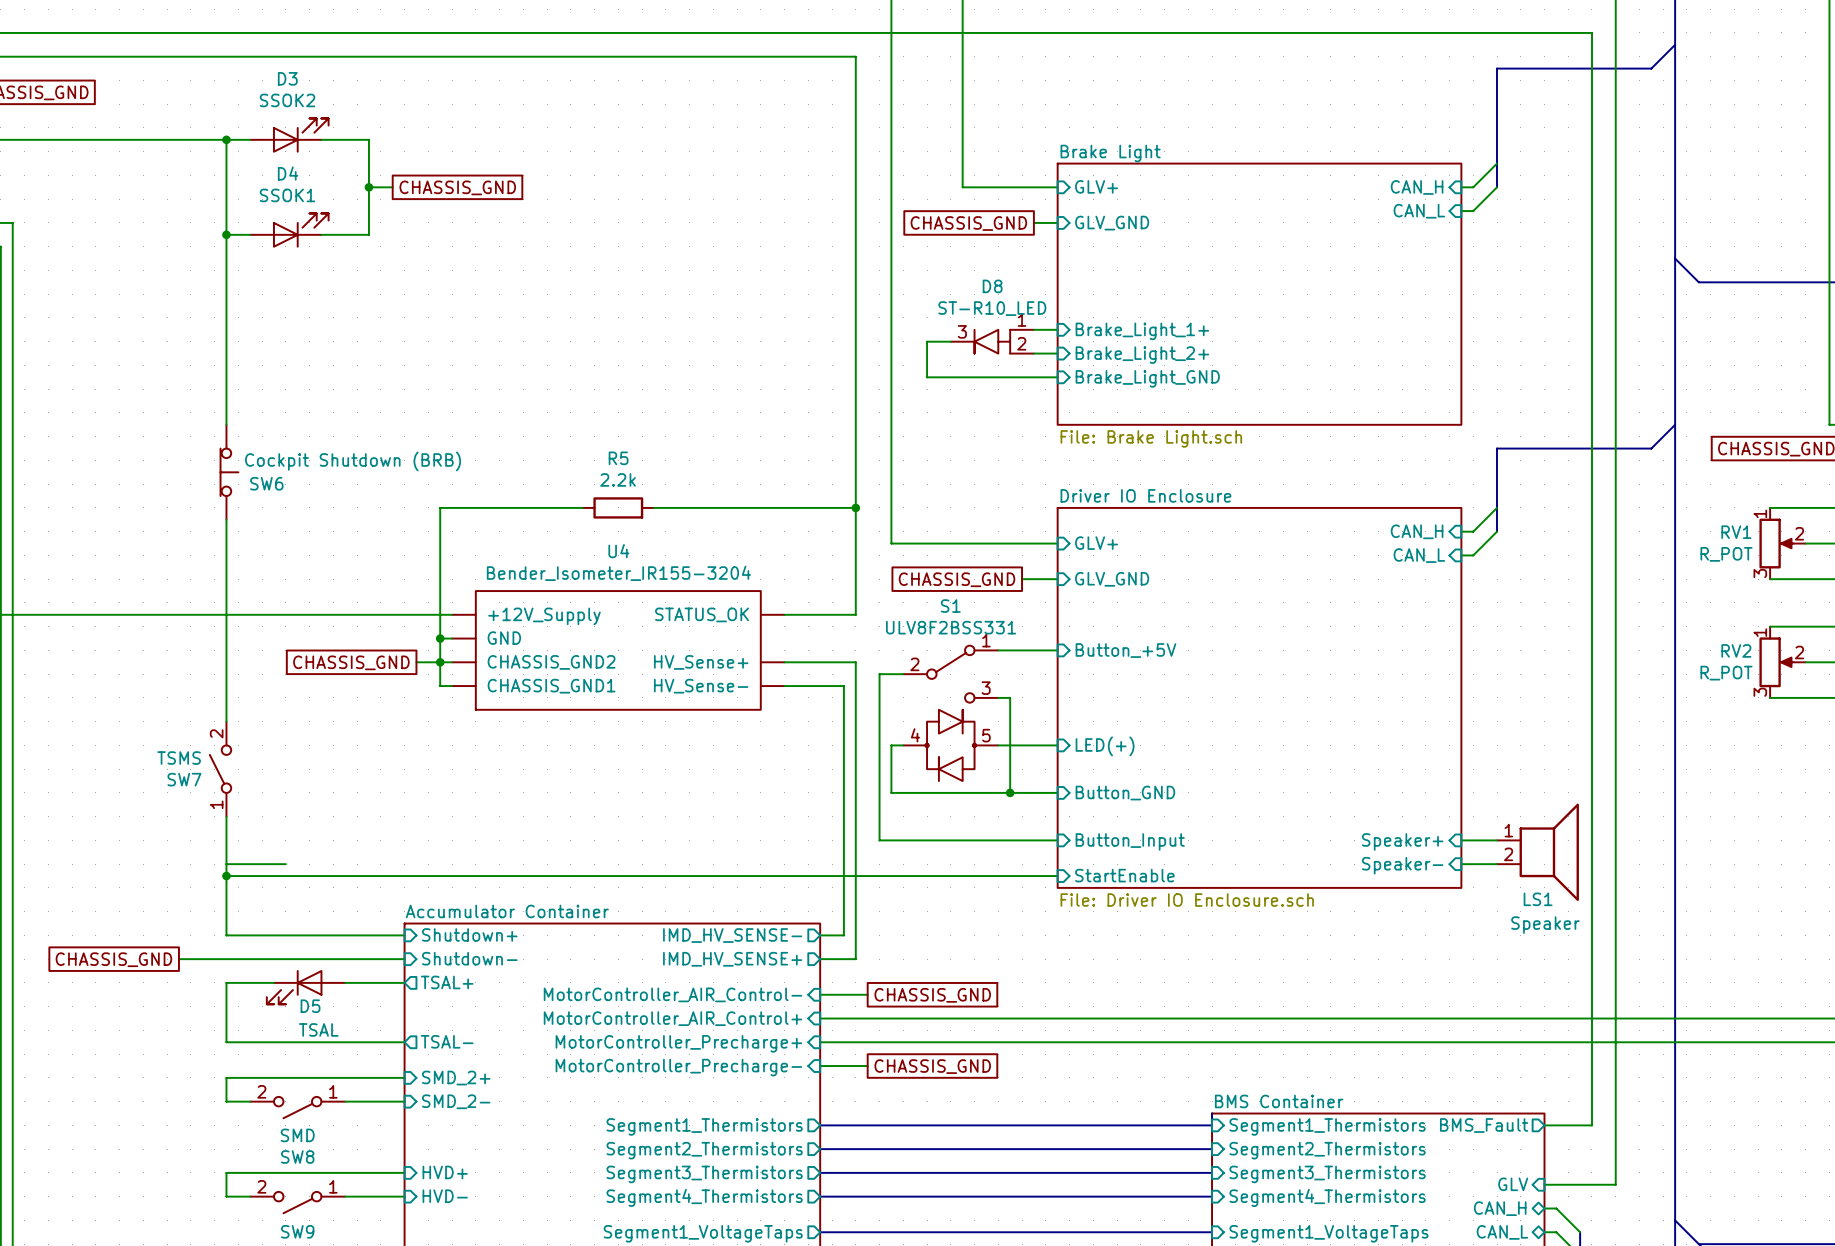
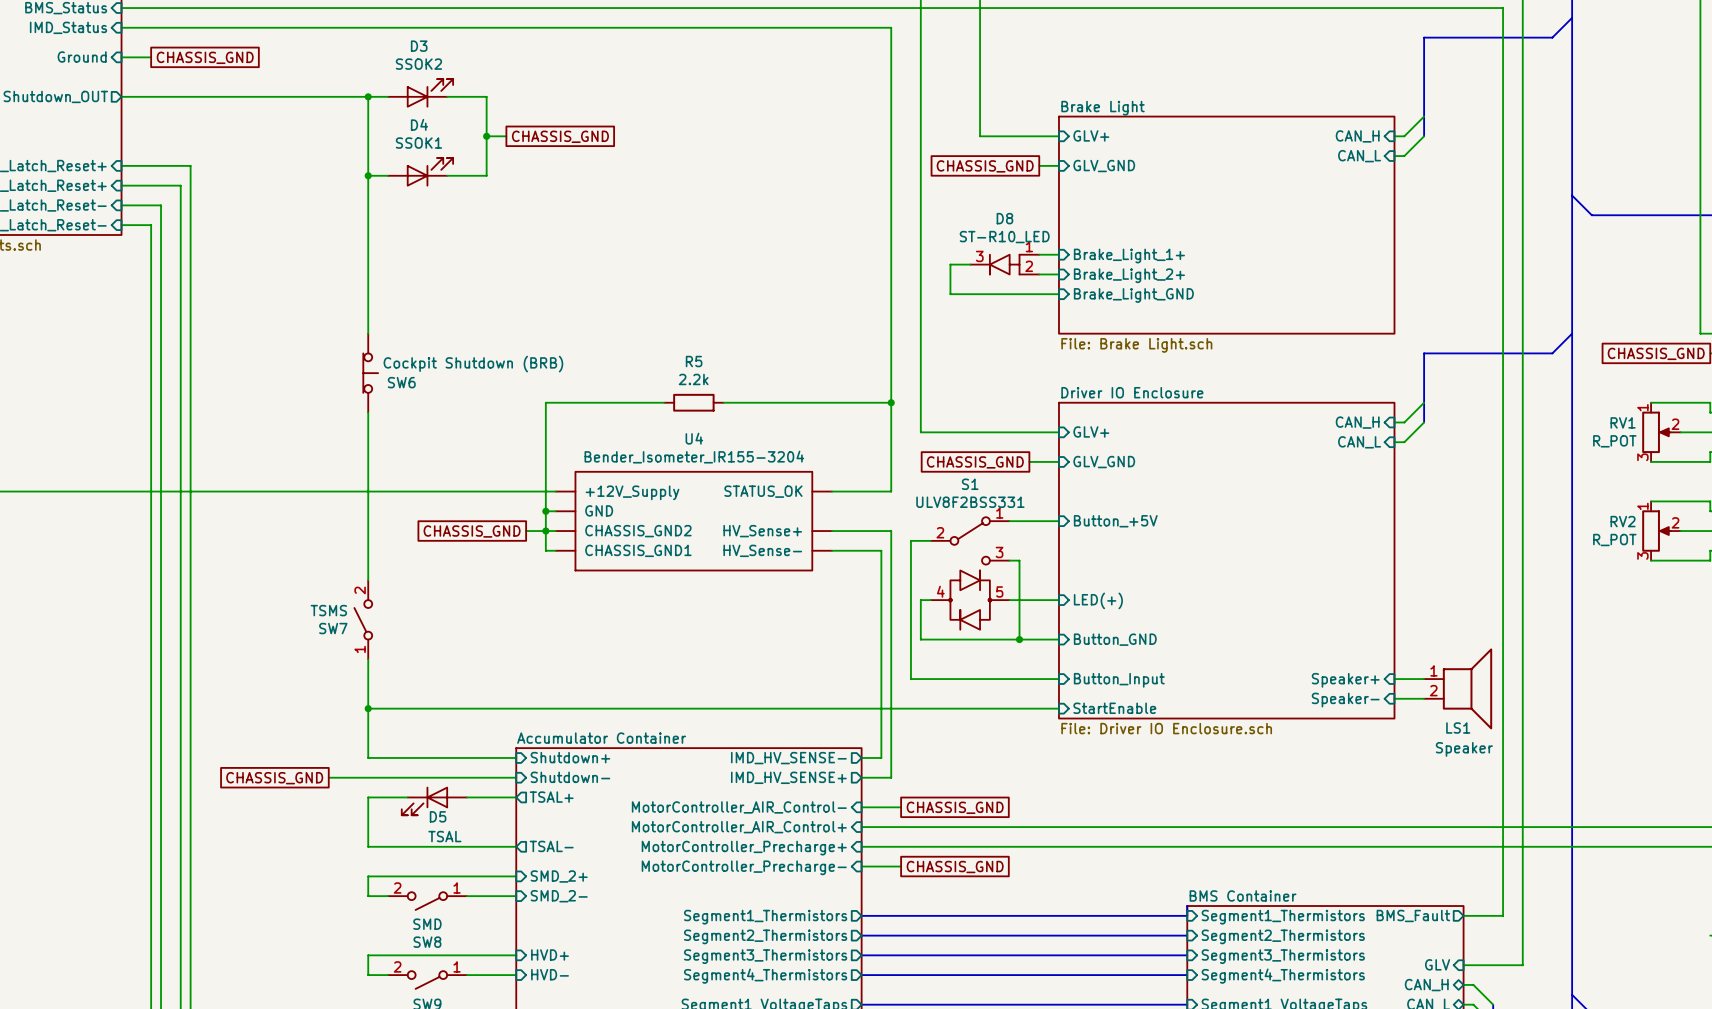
wire: (226, 864) (285, 864) -> none

